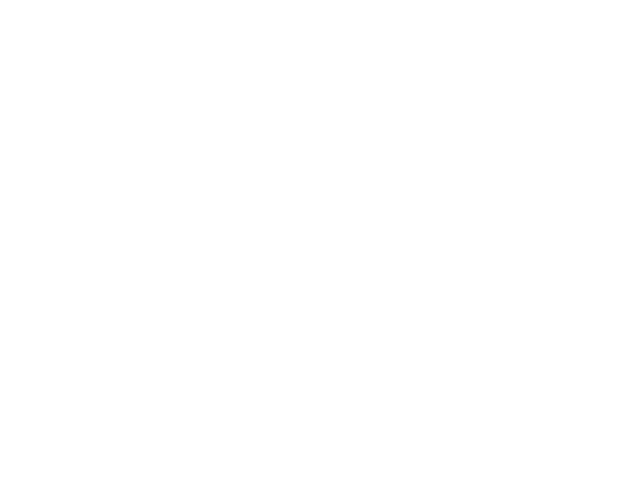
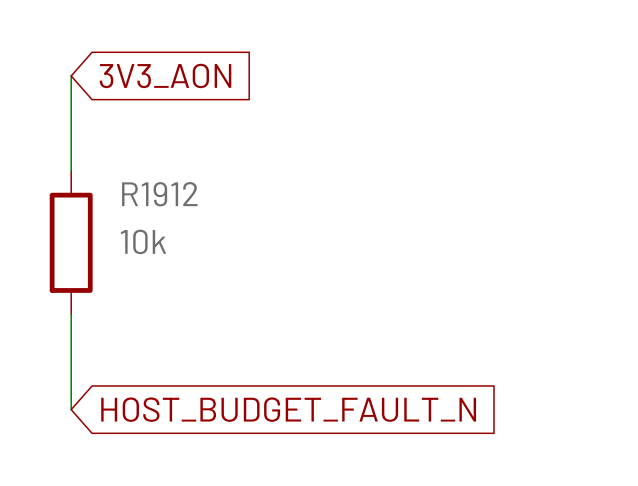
wire: none -> (71, 75) (71, 171)
global label: none -> 3V3_AON (165, 75)
R1912: none -> 10k (71, 242)
wire: none -> (71, 314) (71, 409)
global label: none -> HOST_BUDGET_FAULT_N (288, 409)

